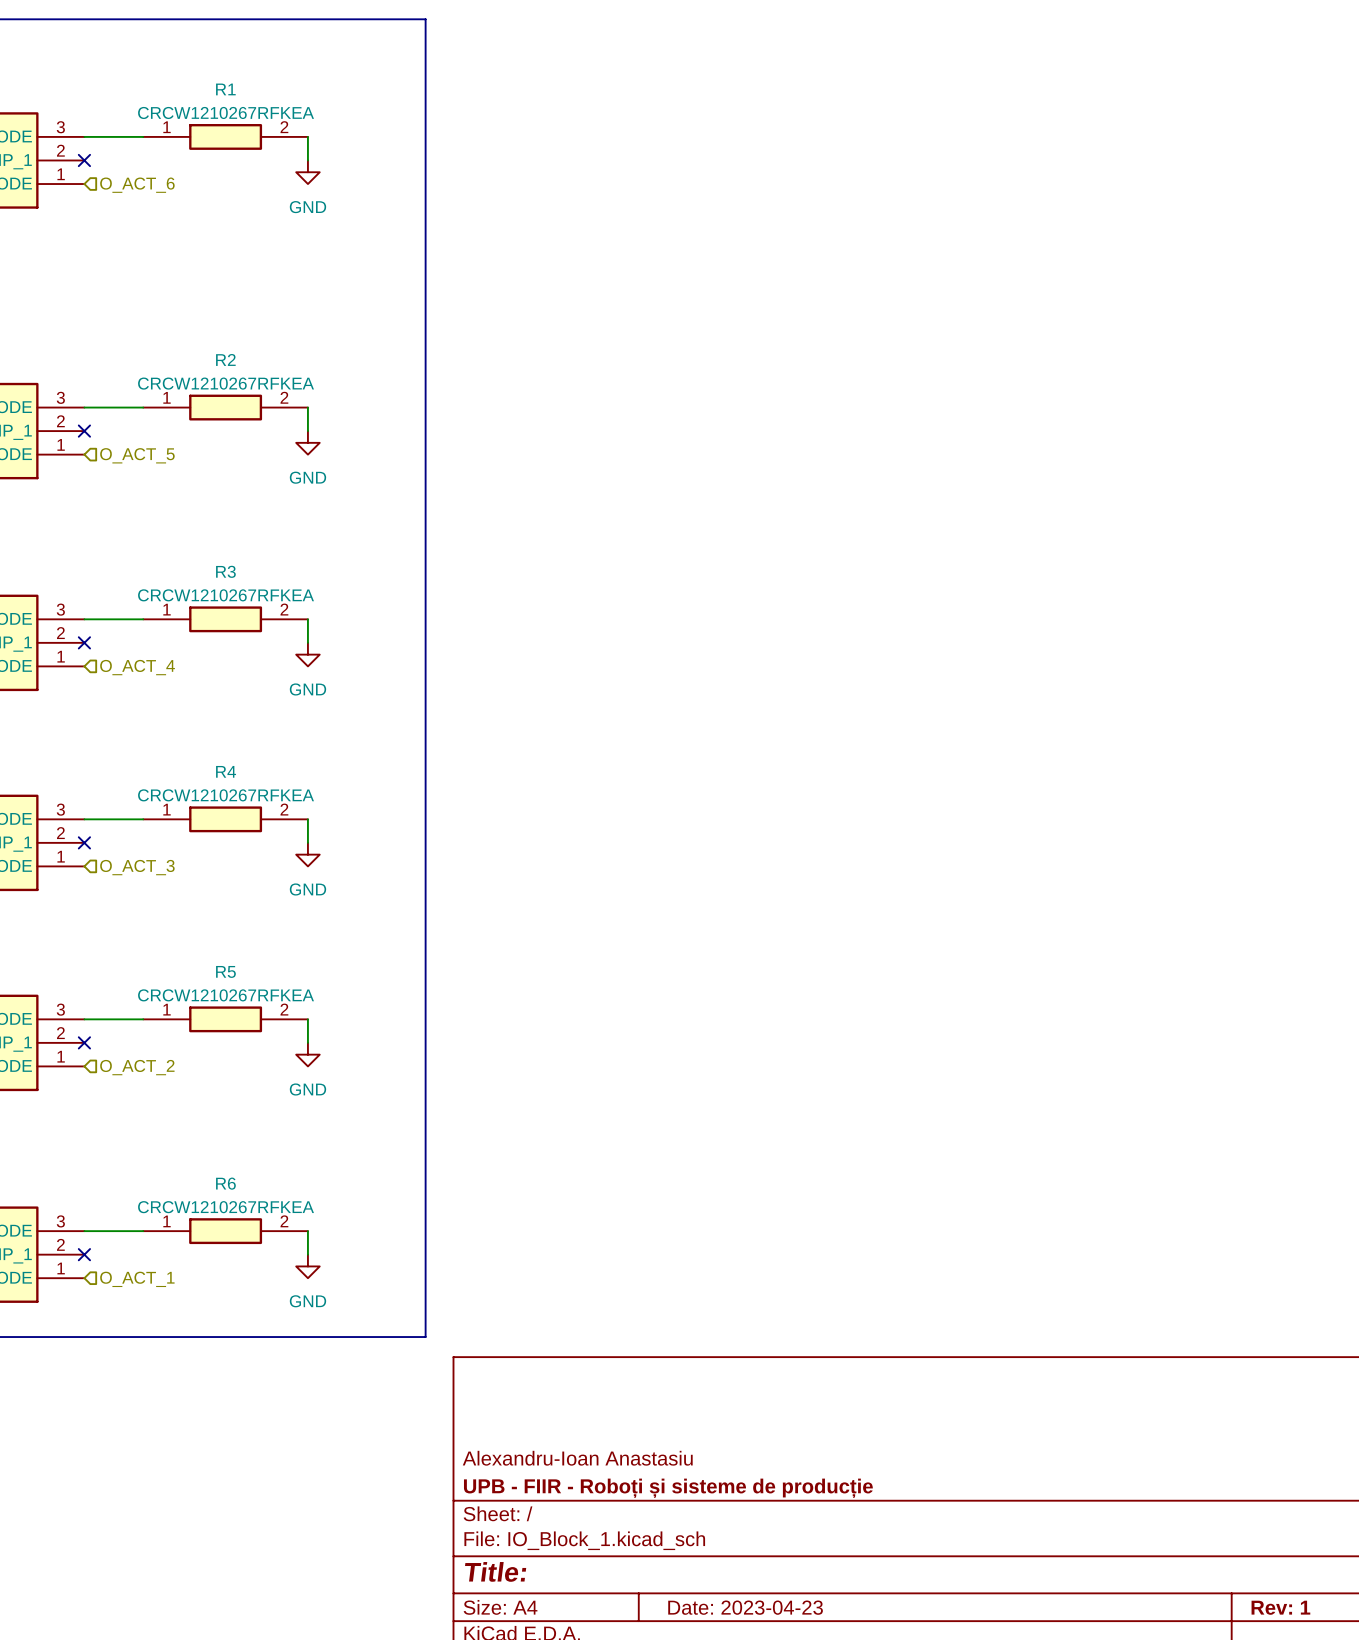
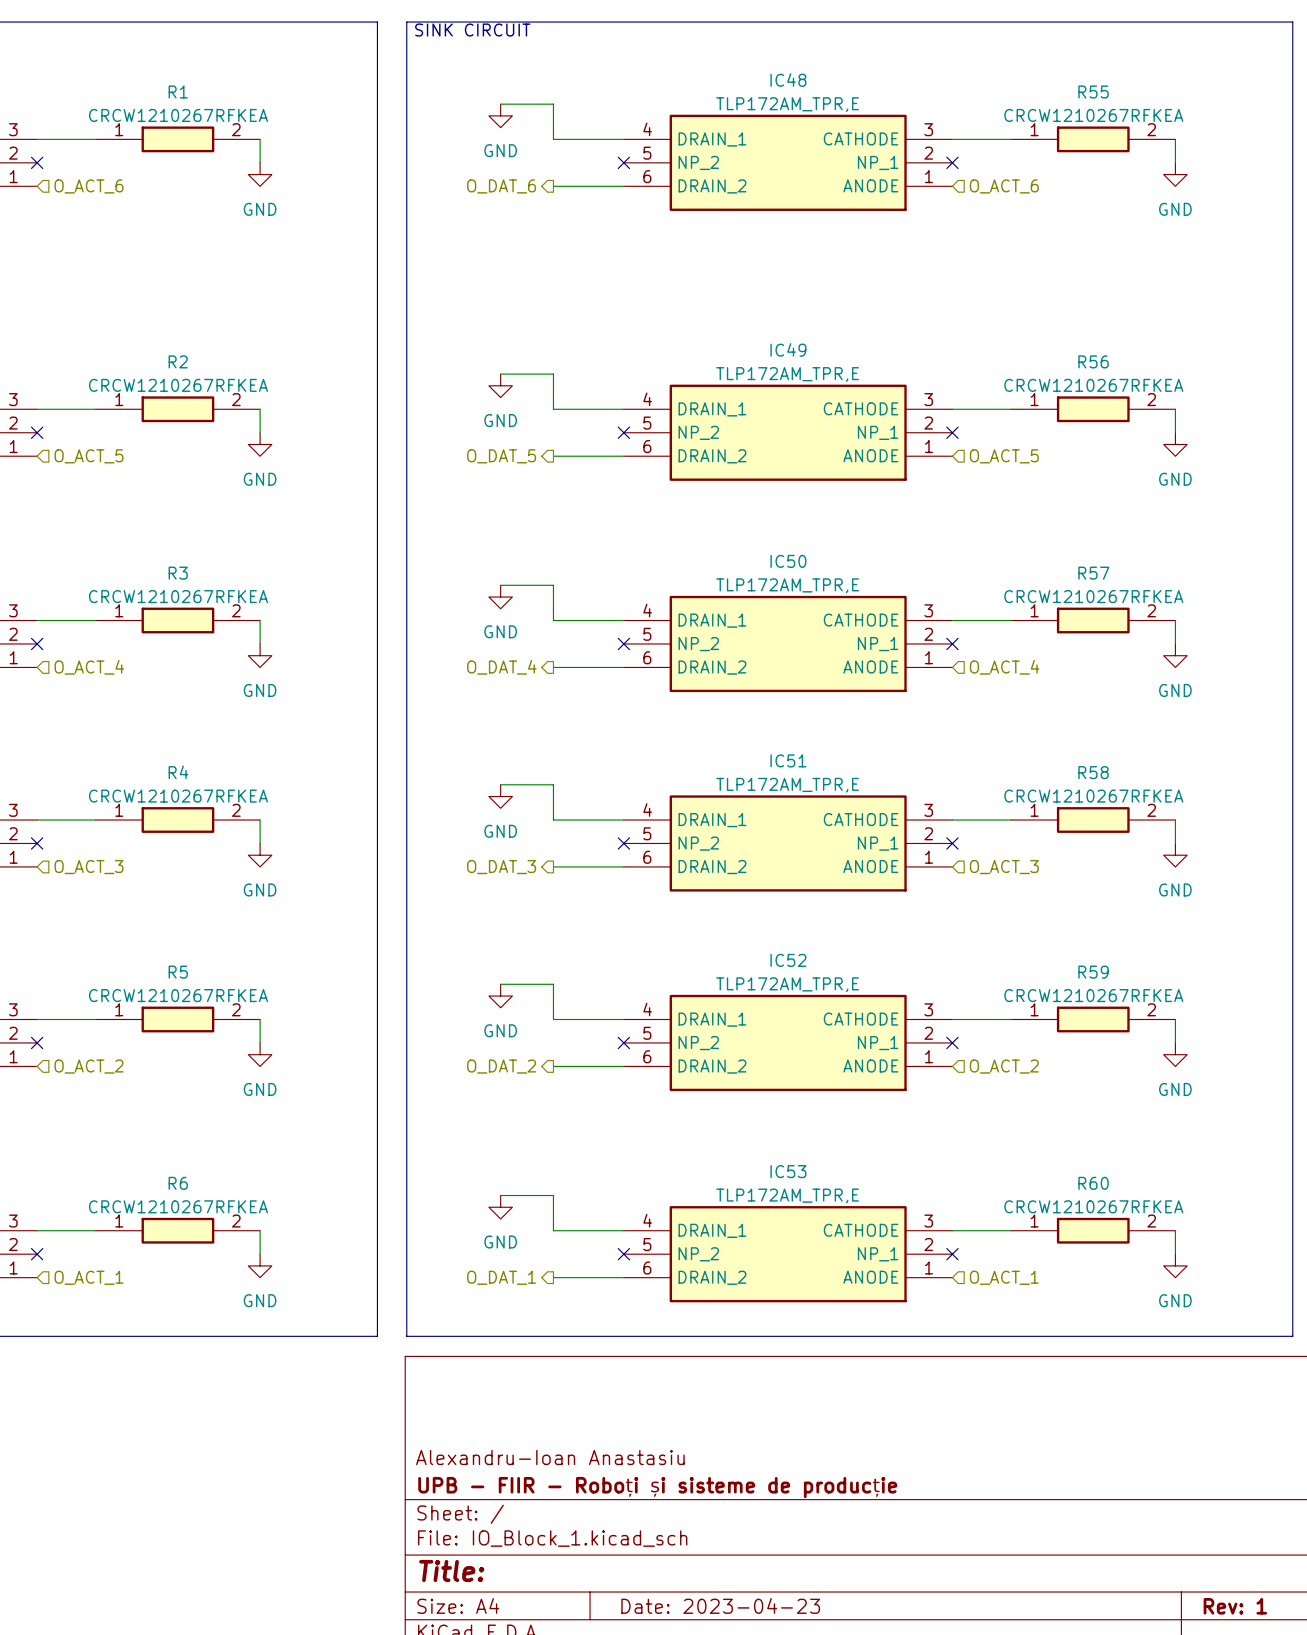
line: none -> (406, 22) (1292, 22) (1292, 1336) (406, 1336) (406, 22)
text: none -> SINK CIRCUIT (472, 30)
wire: none -> (500, 104) (553, 104) (553, 139) (623, 139)
power symbol: none -> GND (500, 115)
wire: none -> (952, 139) (1011, 139)
R55: none -> CRCW1210267RFKEA (1093, 139)
wire: none -> (1175, 139) (1175, 162)
no-connect mark: none -> (623, 162)
IC48: none -> TLP172AM_TPR,E (788, 162)
no-connect mark: none -> (952, 162)
power symbol: none -> GND (1175, 174)
wire: none -> (553, 186) (623, 186)
hierarchical label: none -> O_DAT_6 (501, 186)
hierarchical label: none -> O_ACT_6 (1004, 186)
wire: none -> (500, 374) (553, 374) (553, 409) (623, 409)
power symbol: none -> GND (500, 385)
wire: none -> (952, 409) (1011, 409)
R56: none -> CRCW1210267RFKEA (1093, 409)
wire: none -> (1175, 409) (1175, 432)
no-connect mark: none -> (623, 432)
IC49: none -> TLP172AM_TPR,E (788, 432)
no-connect mark: none -> (952, 432)
power symbol: none -> GND (1175, 444)
wire: none -> (553, 456) (623, 456)
hierarchical label: none -> O_DAT_5 (501, 456)
hierarchical label: none -> O_ACT_5 (1004, 456)
wire: none -> (500, 585) (553, 585) (553, 620) (623, 620)
power symbol: none -> GND (500, 597)
wire: none -> (952, 620) (1011, 620)
R57: none -> CRCW1210267RFKEA (1093, 620)
wire: none -> (1175, 620) (1175, 643)
no-connect mark: none -> (623, 643)
IC50: none -> TLP172AM_TPR,E (788, 643)
no-connect mark: none -> (952, 643)
power symbol: none -> GND (1175, 655)
wire: none -> (553, 667) (623, 667)
hierarchical label: none -> O_DAT_4 (501, 667)
hierarchical label: none -> O_ACT_4 (1004, 667)
wire: none -> (500, 784) (553, 784) (553, 820) (623, 820)
power symbol: none -> GND (500, 796)
wire: none -> (952, 820) (1011, 820)
R58: none -> CRCW1210267RFKEA (1093, 820)
wire: none -> (1175, 820) (1175, 843)
no-connect mark: none -> (623, 843)
IC51: none -> TLP172AM_TPR,E (788, 843)
no-connect mark: none -> (952, 843)
power symbol: none -> GND (1175, 855)
wire: none -> (553, 866) (623, 866)
hierarchical label: none -> O_DAT_3 (501, 867)
hierarchical label: none -> O_ACT_3 (1004, 867)
wire: none -> (500, 984) (553, 984) (553, 1019) (623, 1019)
power symbol: none -> GND (500, 996)
wire: none -> (952, 1019) (1011, 1019)
R59: none -> CRCW1210267RFKEA (1093, 1019)
wire: none -> (1175, 1019) (1175, 1042)
no-connect mark: none -> (623, 1042)
IC52: none -> TLP172AM_TPR,E (788, 1042)
no-connect mark: none -> (952, 1042)
power symbol: none -> GND (1175, 1054)
wire: none -> (553, 1066) (623, 1066)
hierarchical label: none -> O_DAT_2 (501, 1066)
hierarchical label: none -> O_ACT_2 (1004, 1066)
wire: none -> (500, 1195) (553, 1195) (553, 1230) (623, 1230)
power symbol: none -> GND (500, 1207)
wire: none -> (952, 1230) (1011, 1230)
R60: none -> CRCW1210267RFKEA (1093, 1230)
wire: none -> (1175, 1230) (1175, 1254)
no-connect mark: none -> (623, 1254)
IC53: none -> TLP172AM_TPR,E (788, 1254)
no-connect mark: none -> (952, 1254)
power symbol: none -> GND (1175, 1265)
wire: none -> (553, 1277) (623, 1277)
hierarchical label: none -> O_DAT_1 (501, 1277)
hierarchical label: none -> O_ACT_1 (1004, 1277)

